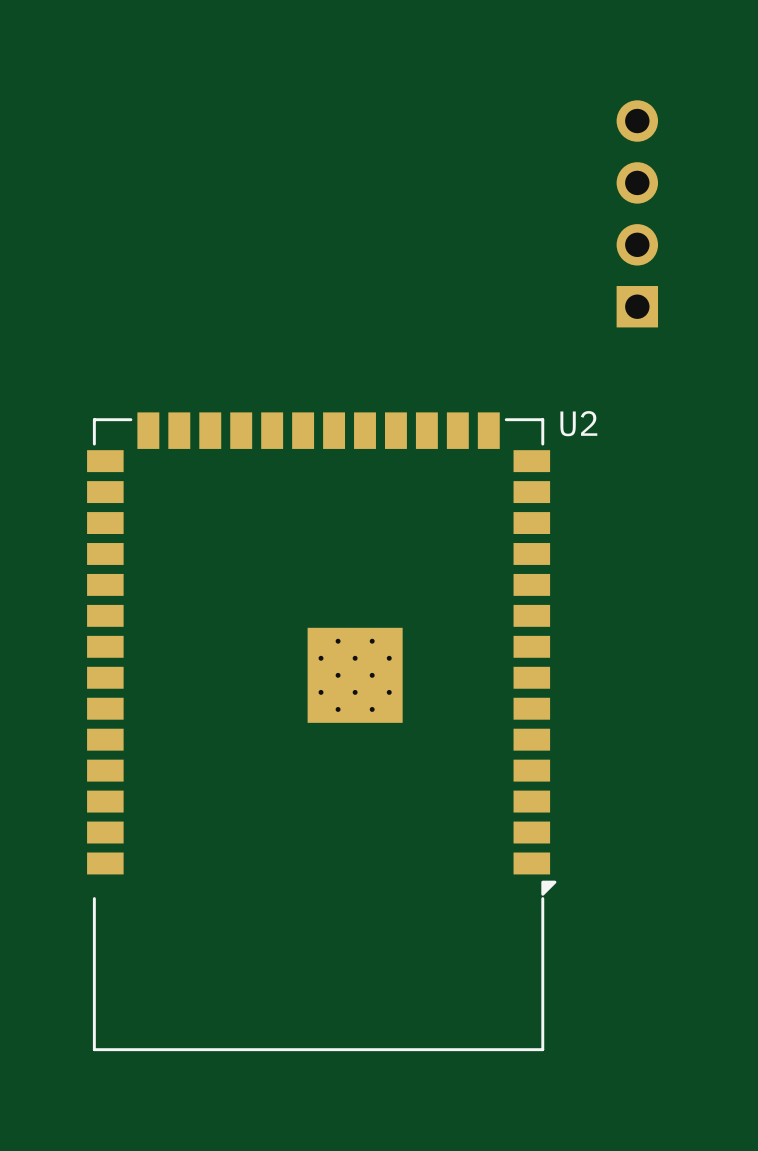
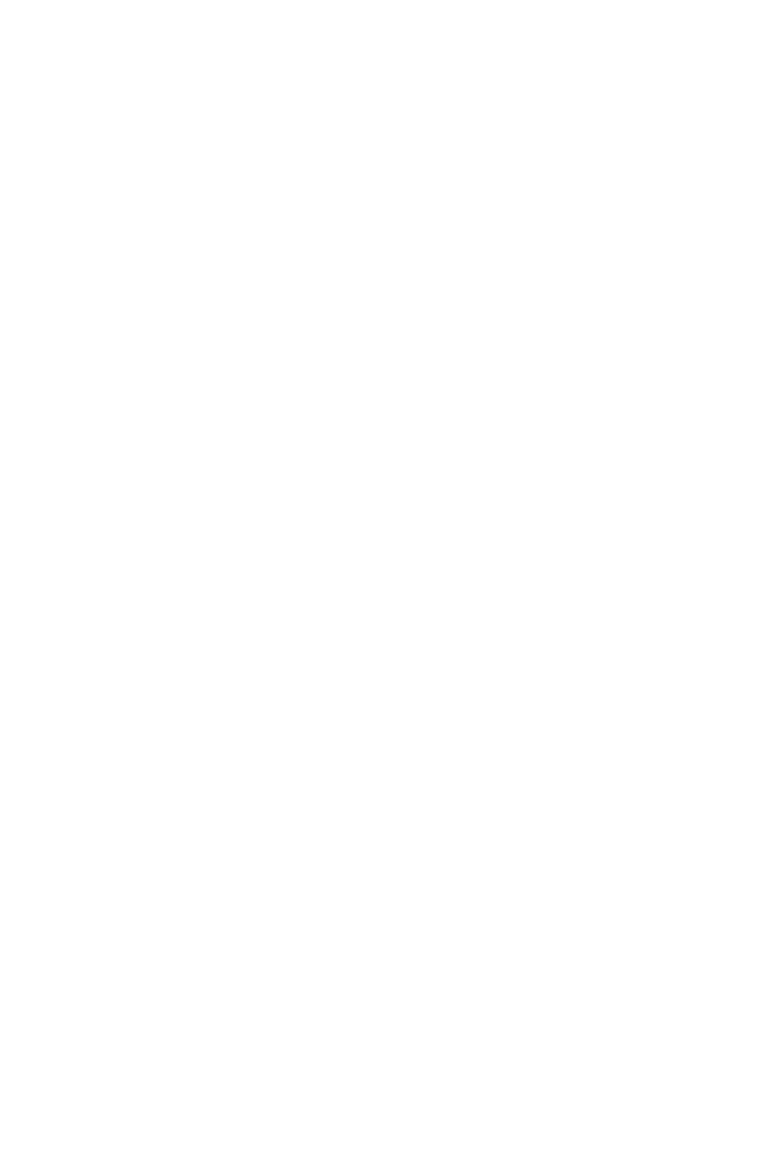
part: (637, 213) -> none
U2: (321, 731) -> none

